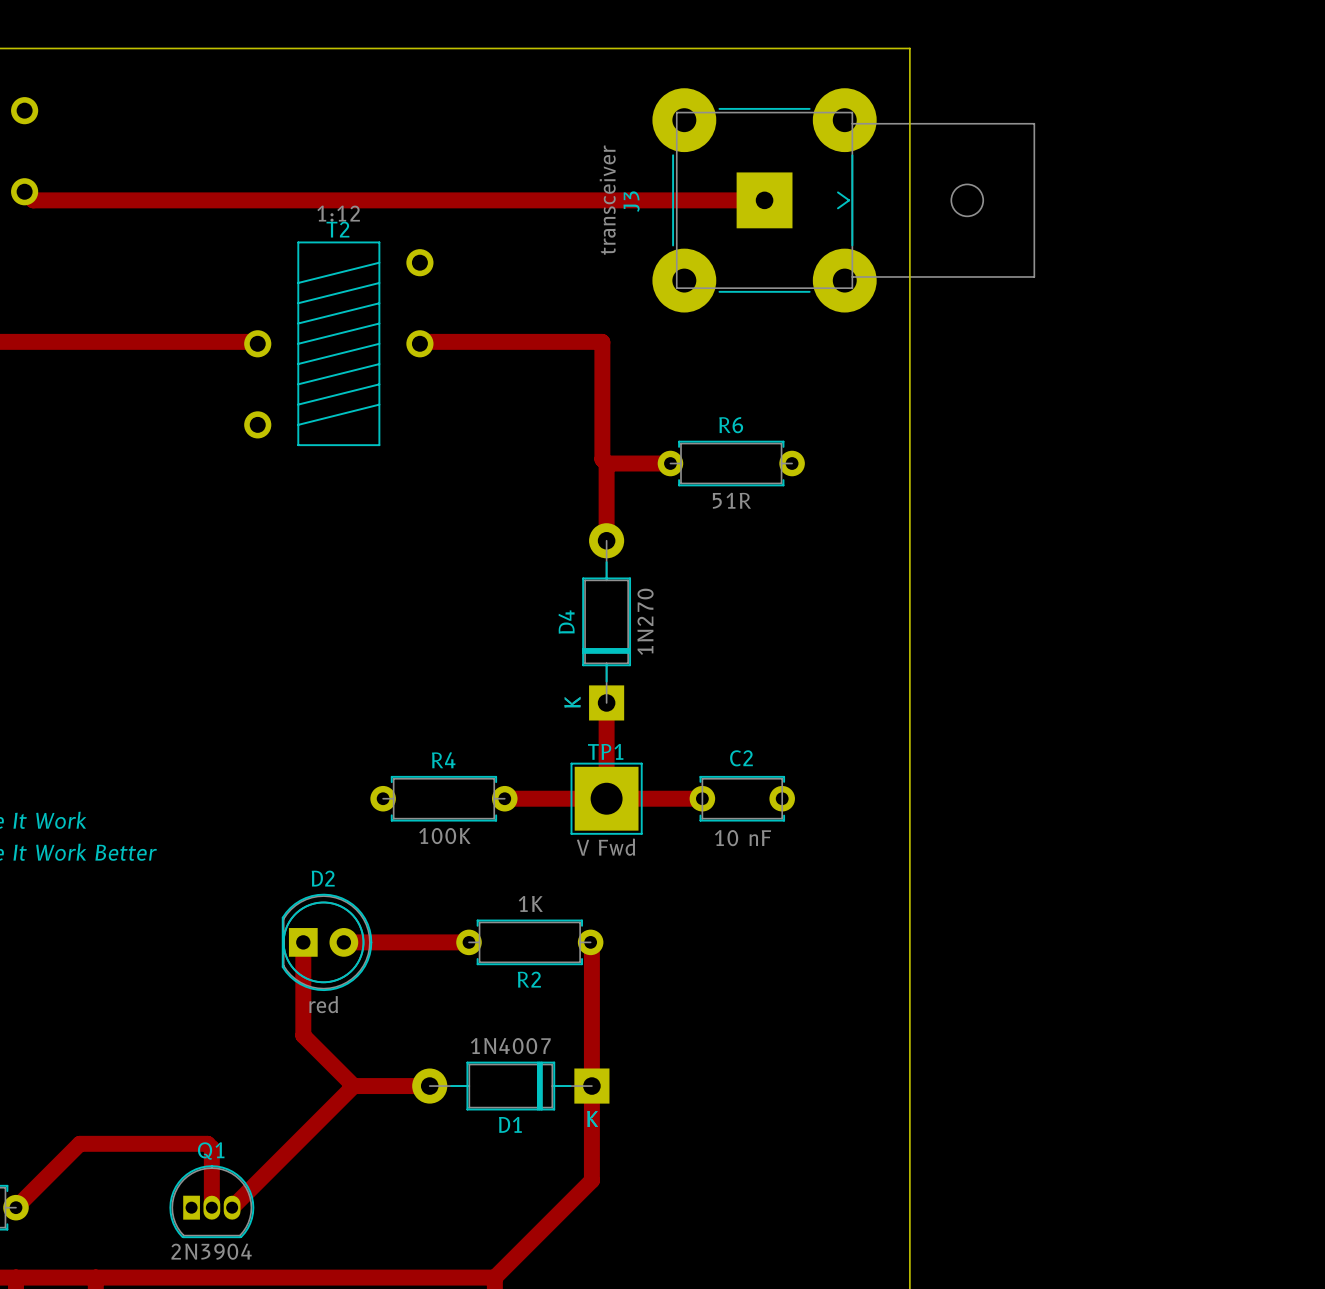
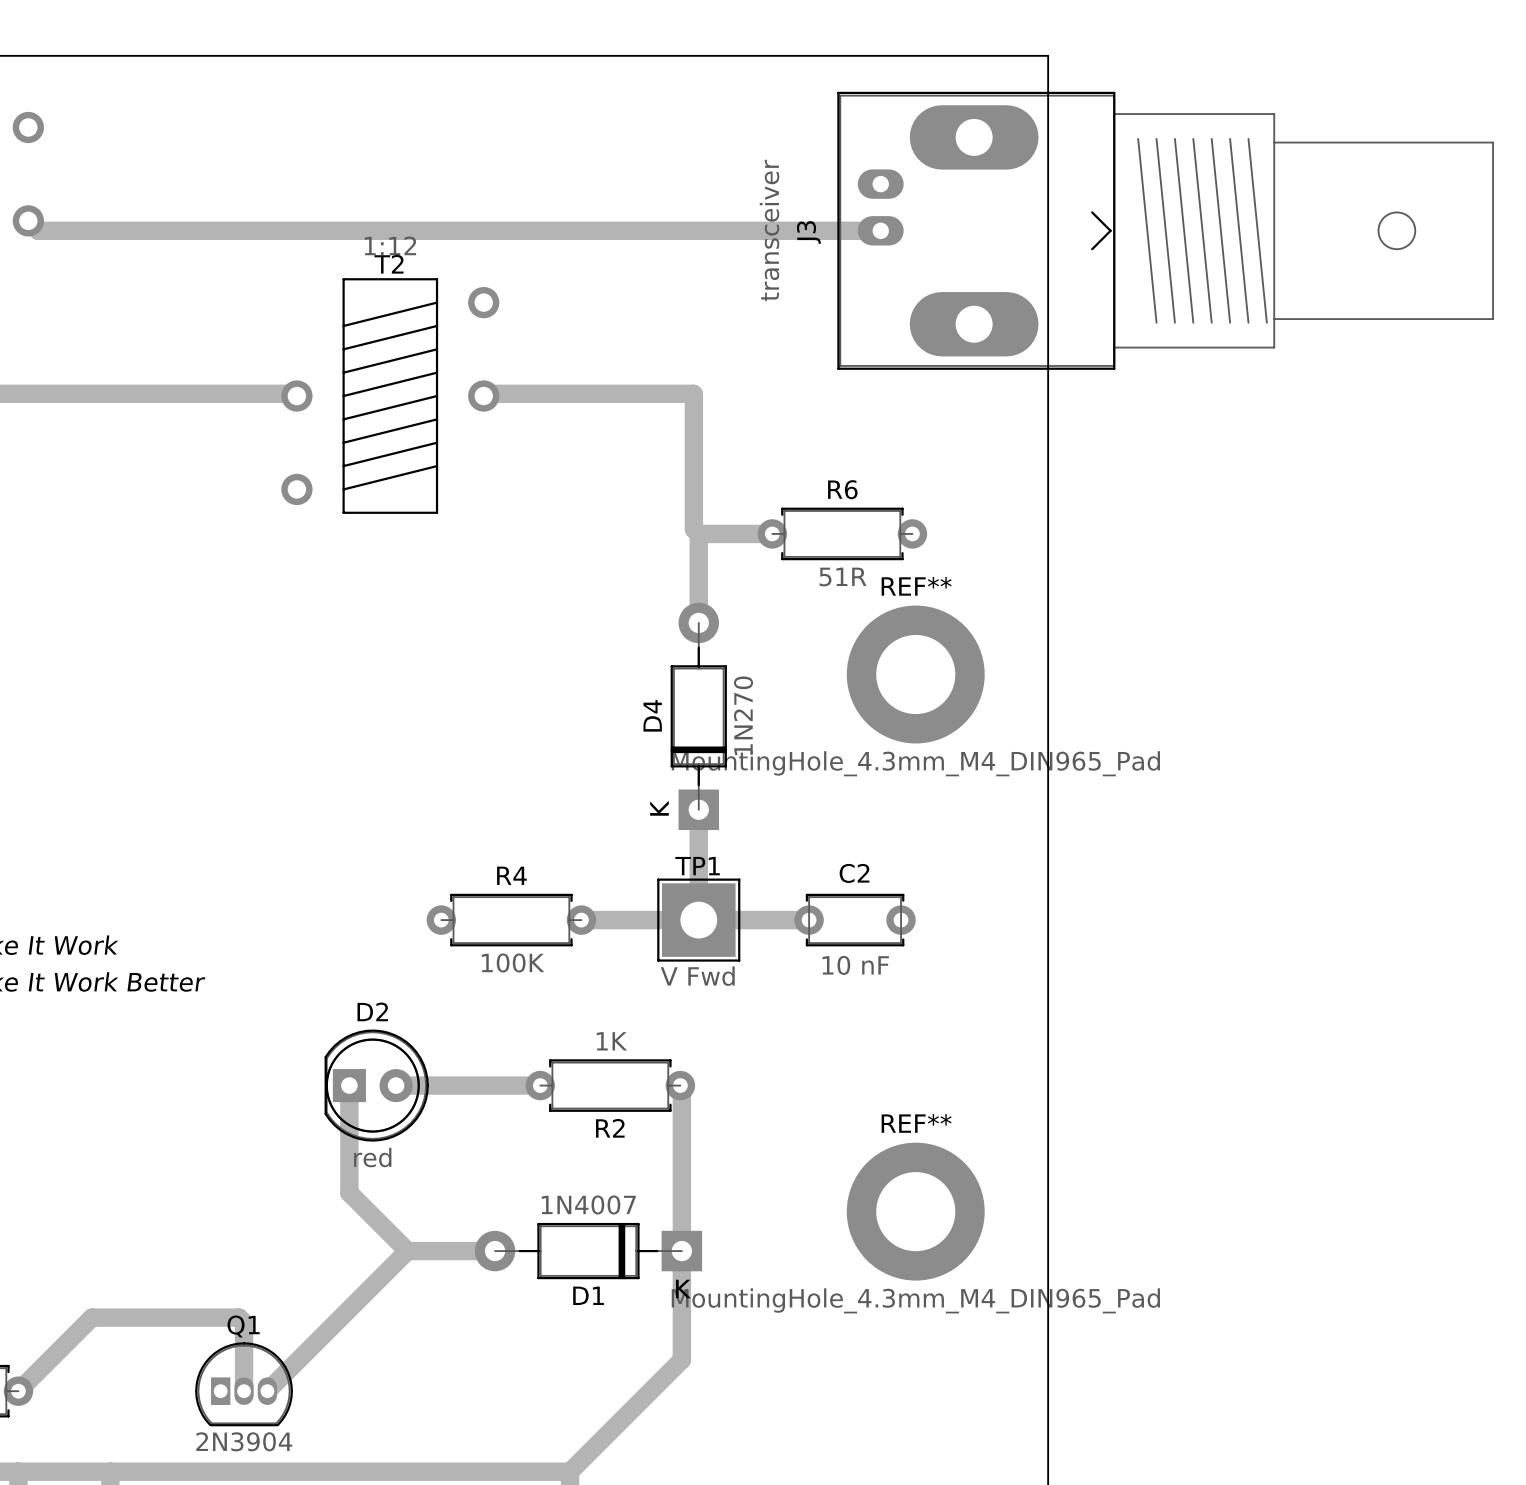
J3 footprint: [652, 88, 1036, 313] -> [837, 91, 1494, 370]
J3 value position: transceiver (607, 200) -> transceiver (769, 230)
J3 name position: J3 (631, 201) -> J3 (808, 232)
REF**: none -> MountingHole_4.3mm_M4_DIN965_Pad (915, 674)
REF**: none -> MountingHole_4.3mm_M4_DIN965_Pad (915, 1211)

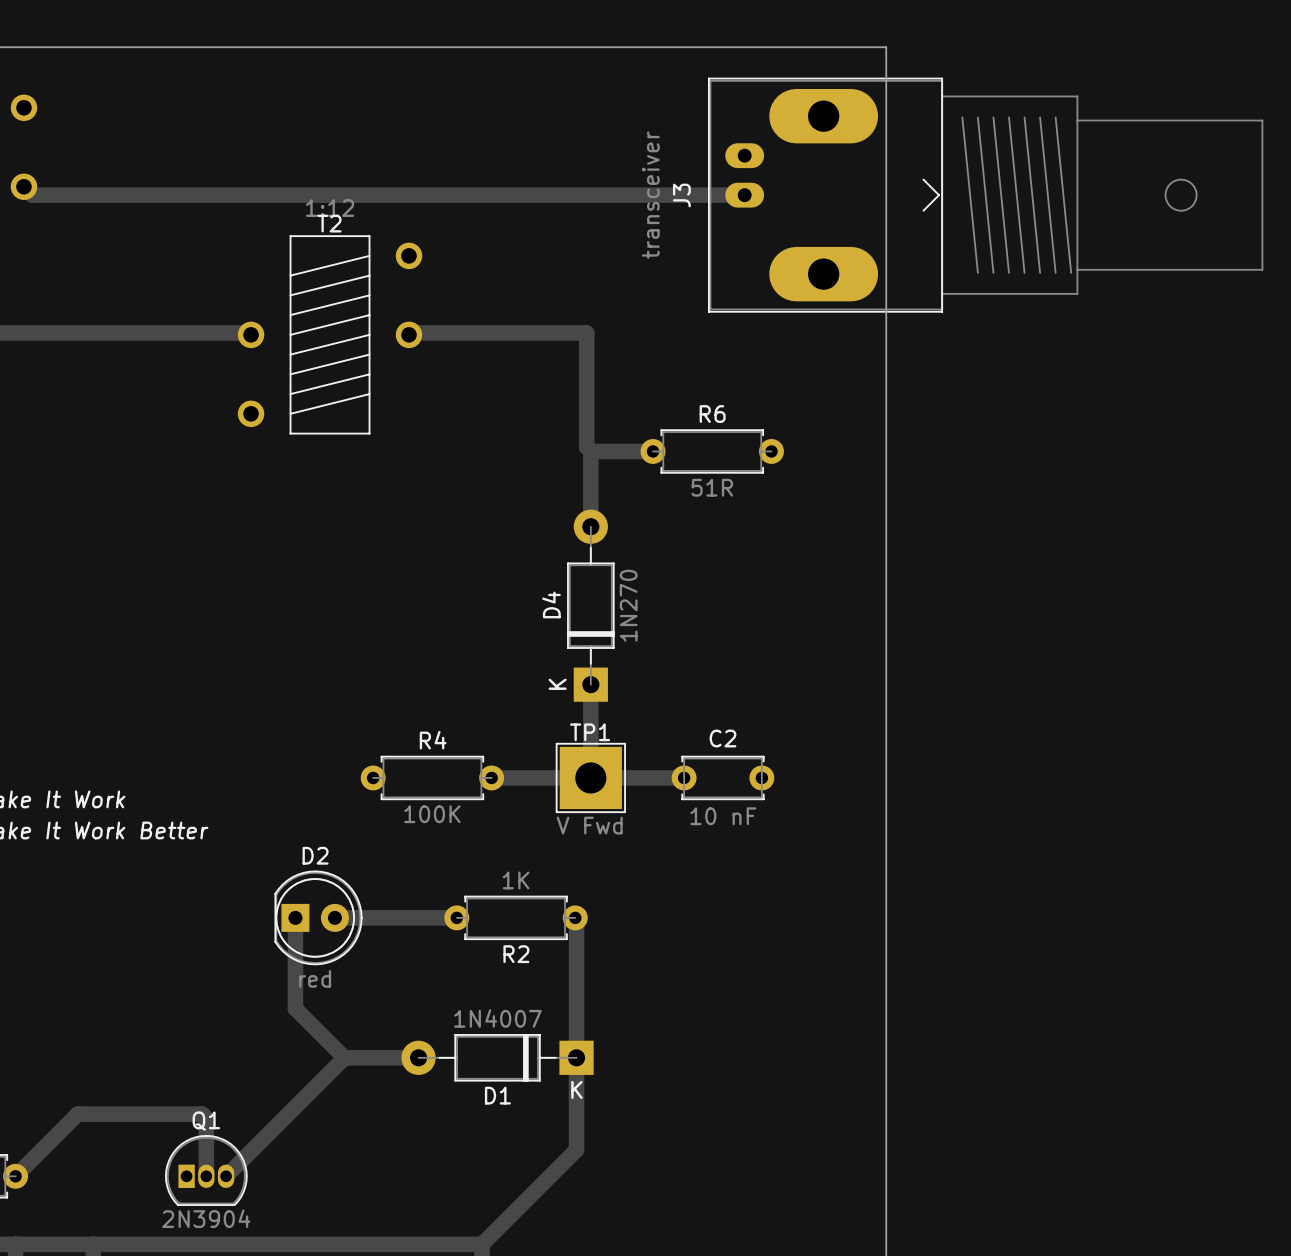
REF**: MountingHole_4.3mm_M4_DIN965_Pad (915, 674) -> none
REF**: MountingHole_4.3mm_M4_DIN965_Pad (915, 1211) -> none

